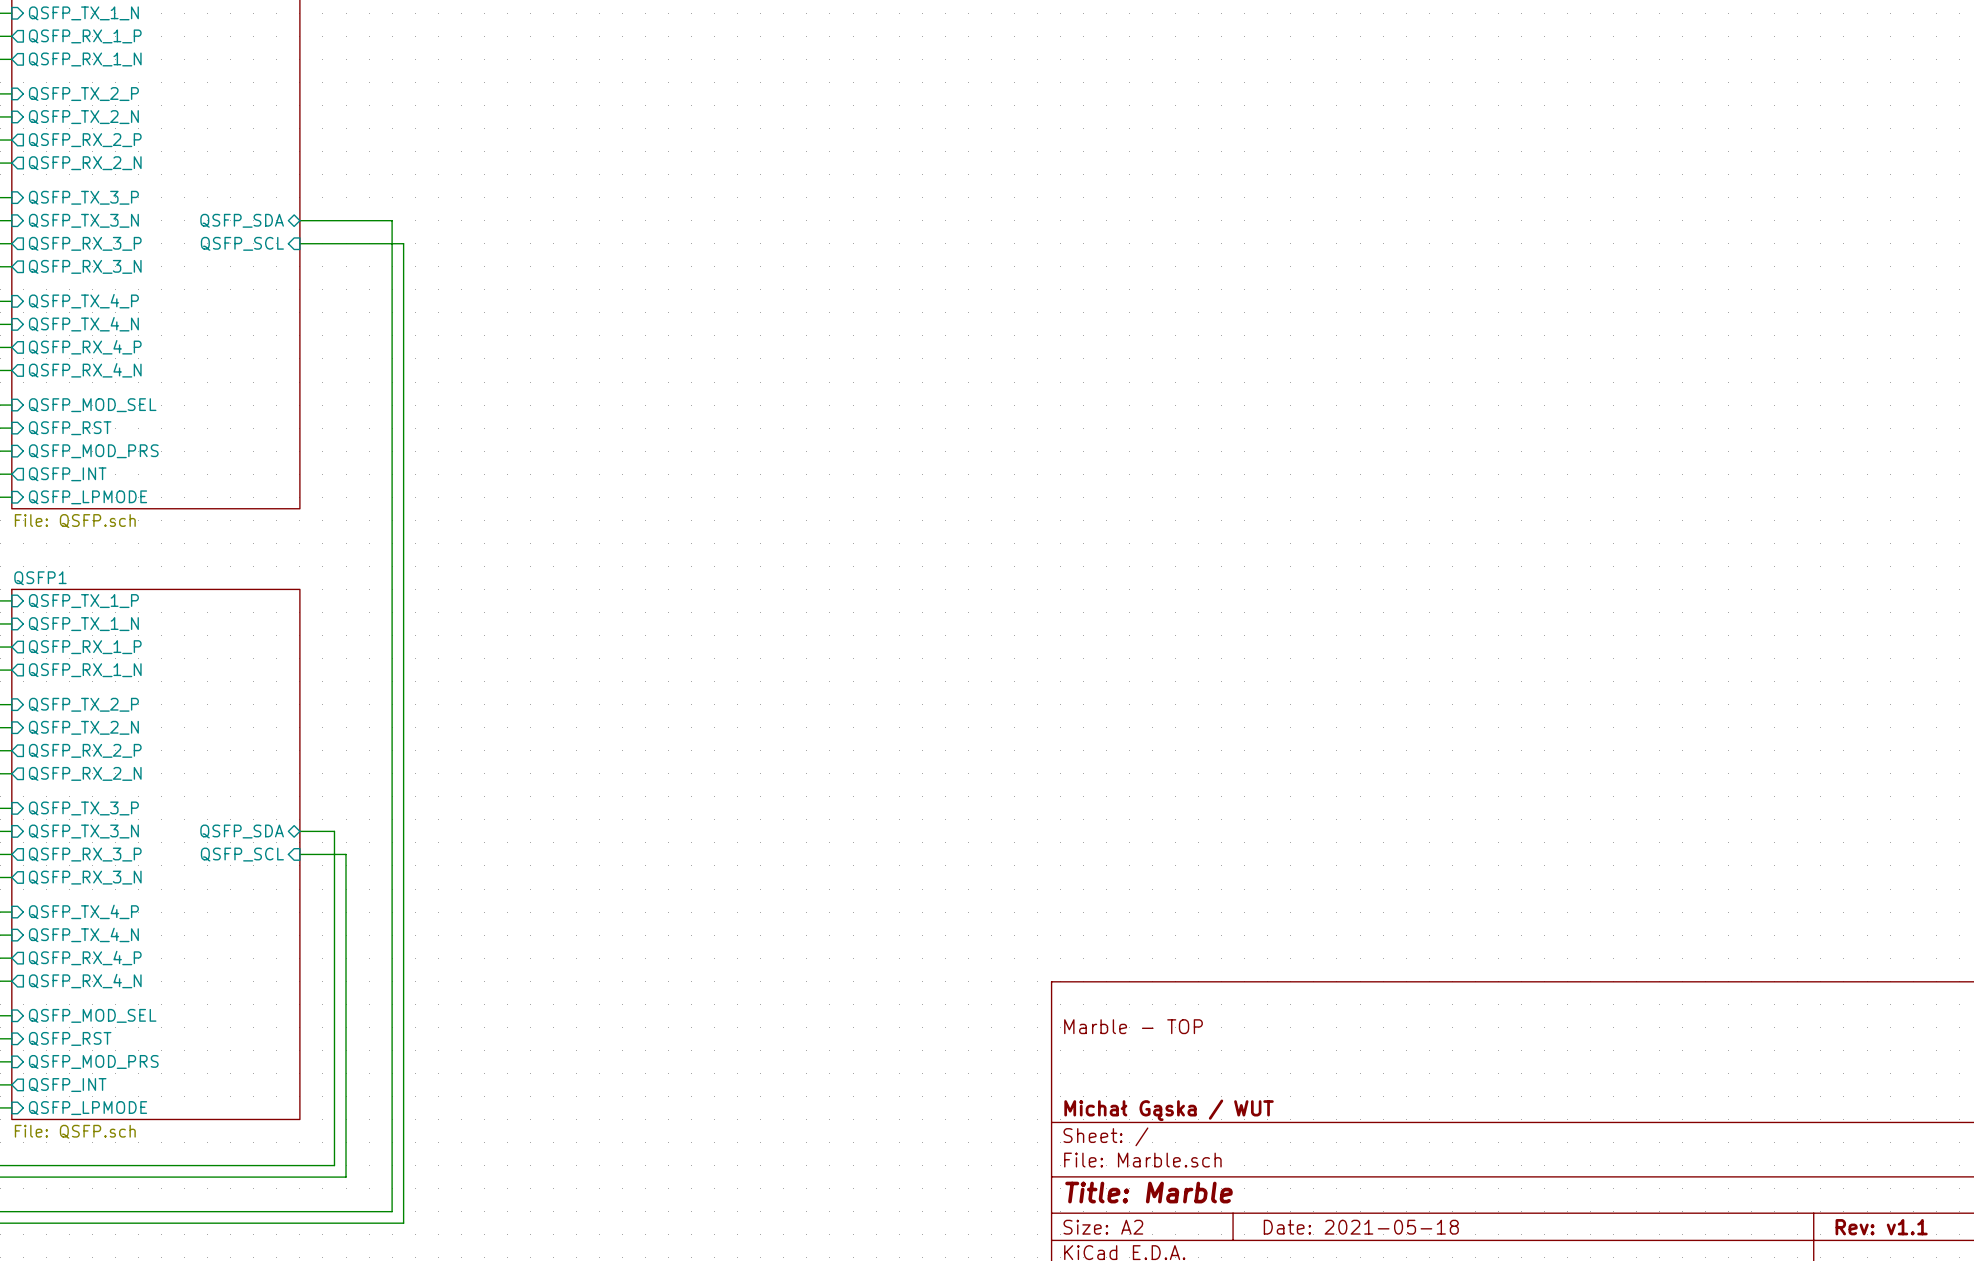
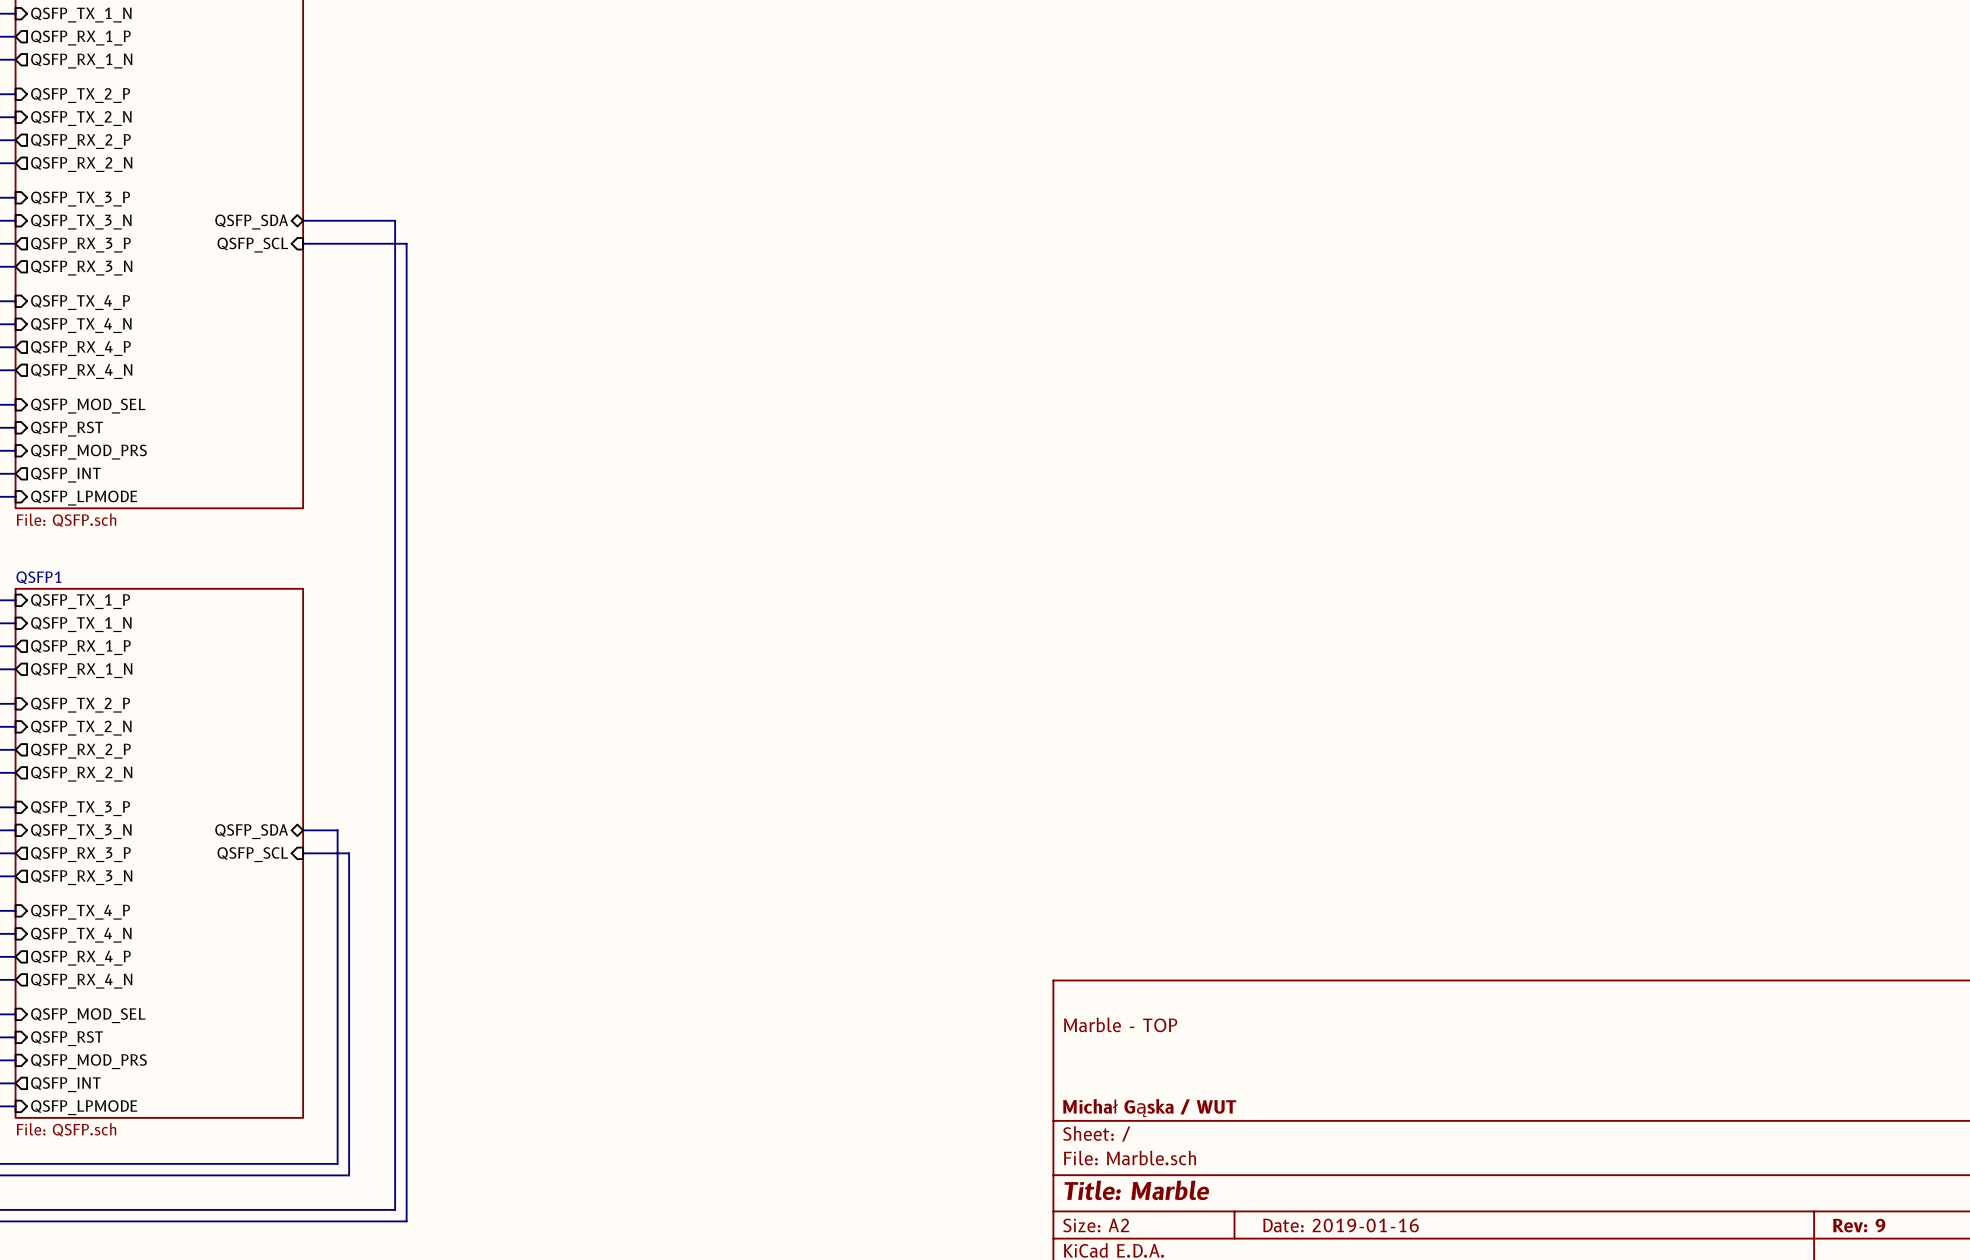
title block: Date: 2021-05-18 (1361, 1227) -> Date: 2019-01-16 (1340, 1225)
title block: Rev: v1.1 (1881, 1227) -> Rev: 9 (1859, 1225)

